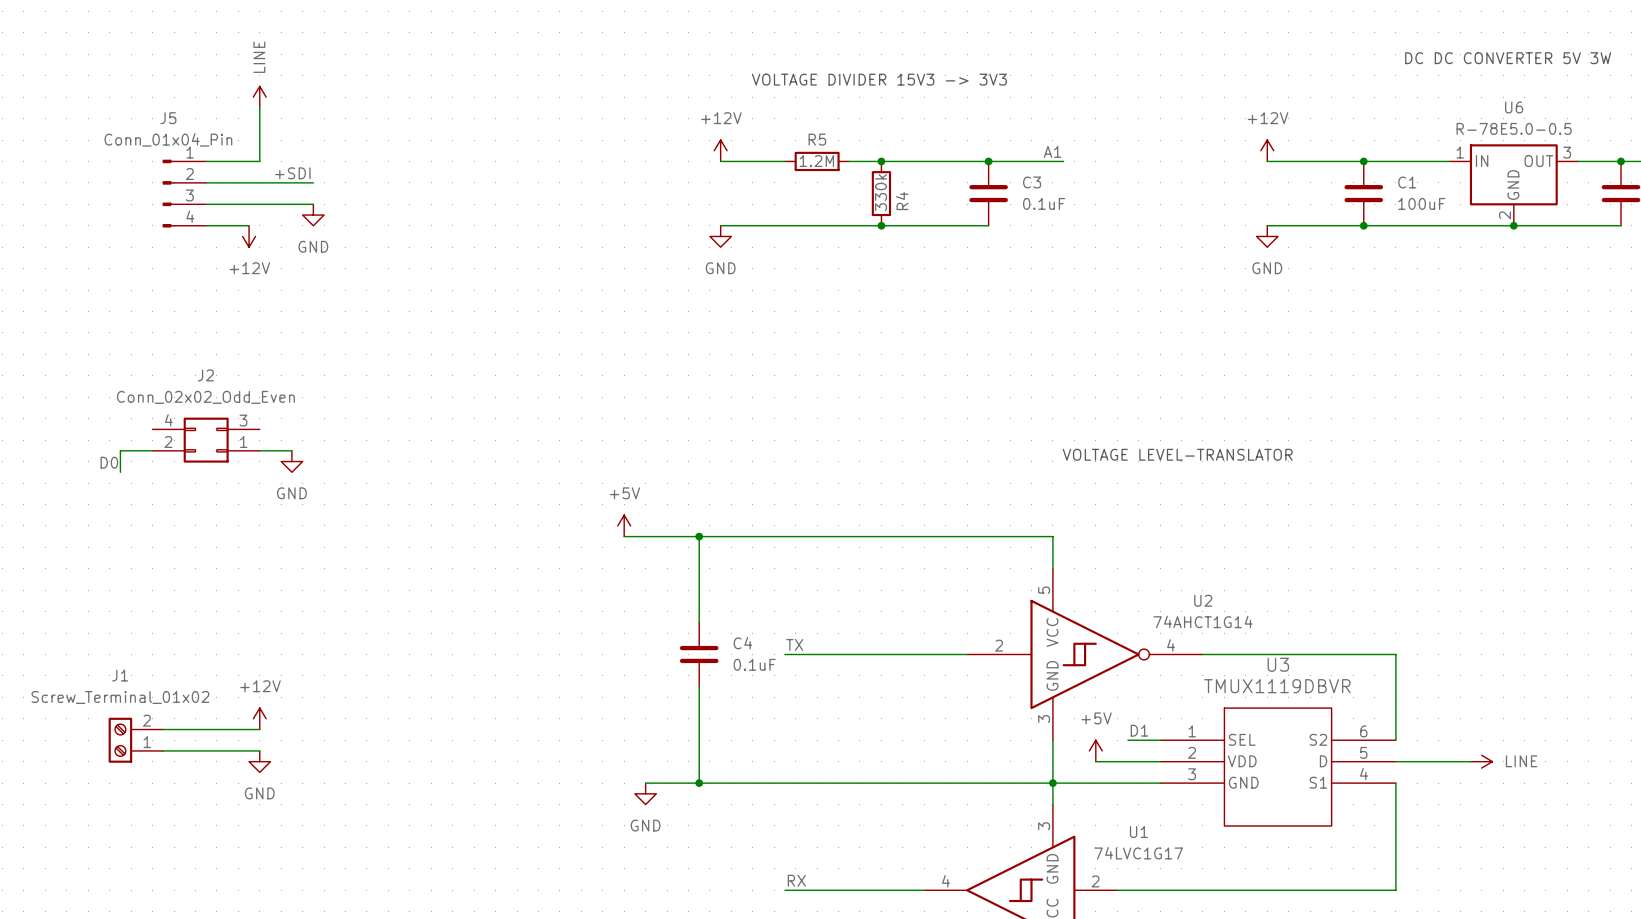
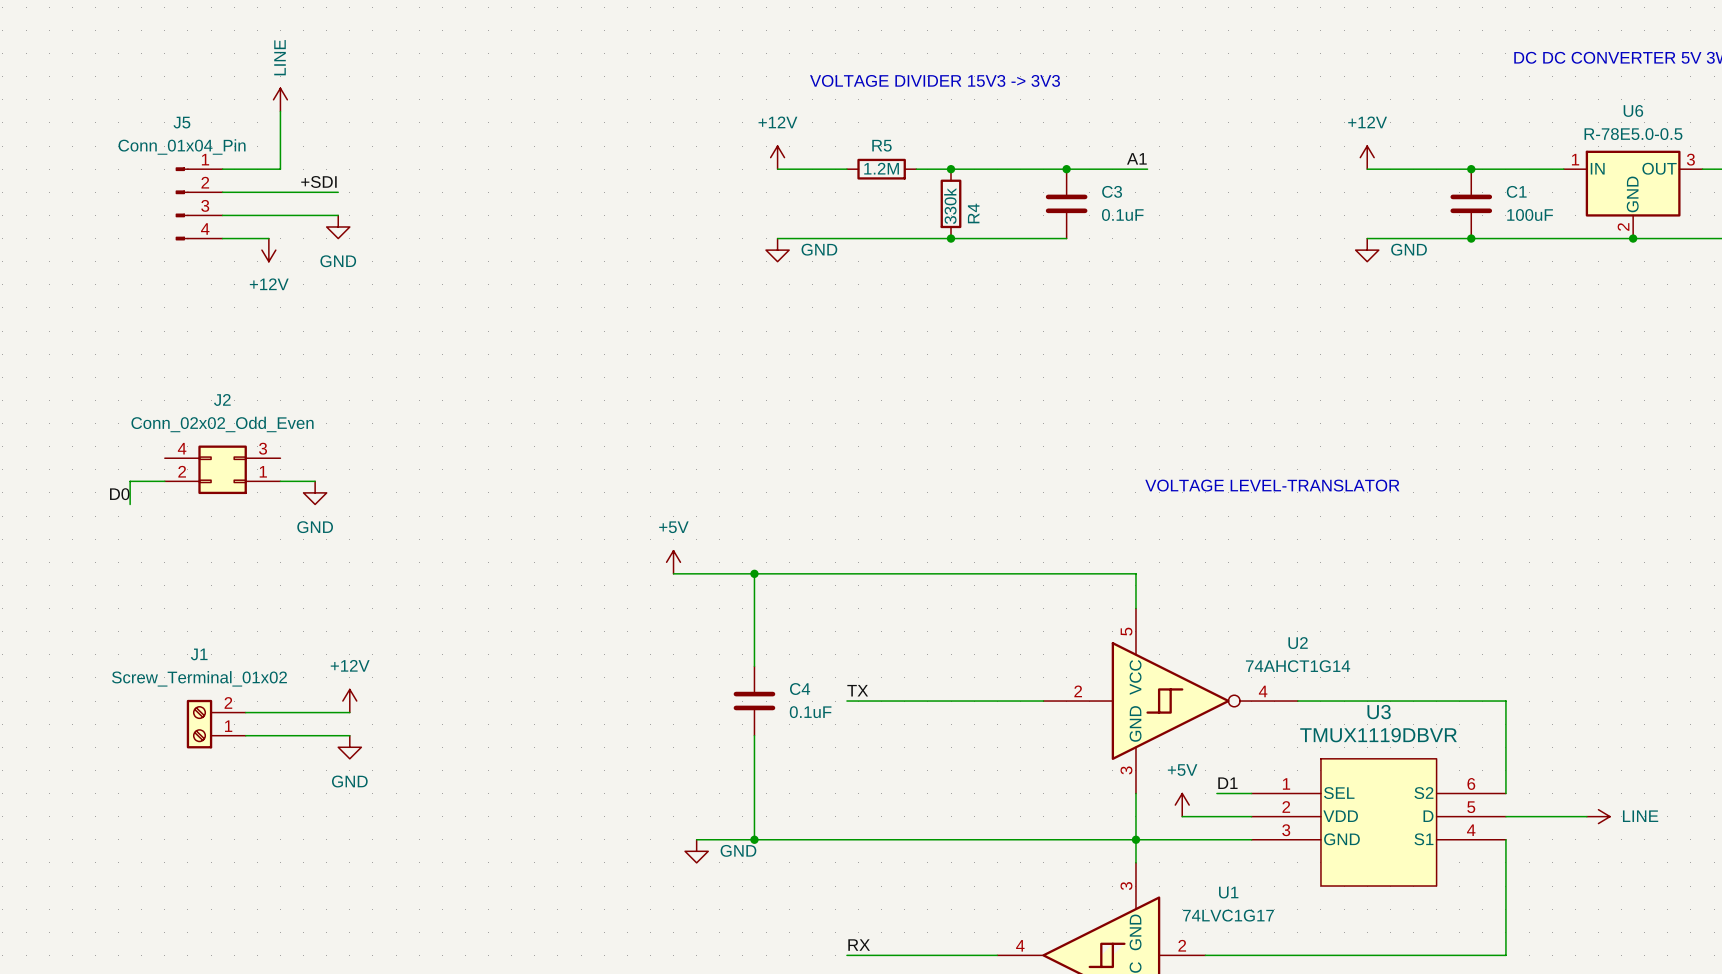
power symbol text position: GND (720, 268) -> GND (819, 249)
power symbol text position: GND (1267, 268) -> GND (1409, 249)
power symbol position: +12V (259, 718) -> +12V (349, 701)
wire: (163, 729) (259, 729) -> (245, 735) (349, 735)
J1 position: (135, 740) -> (216, 724)
wire: (163, 750) (259, 750) -> (245, 712) (349, 712)
power symbol position: GND (259, 761) -> GND (349, 747)
power symbol text position: GND (645, 825) -> GND (738, 850)

